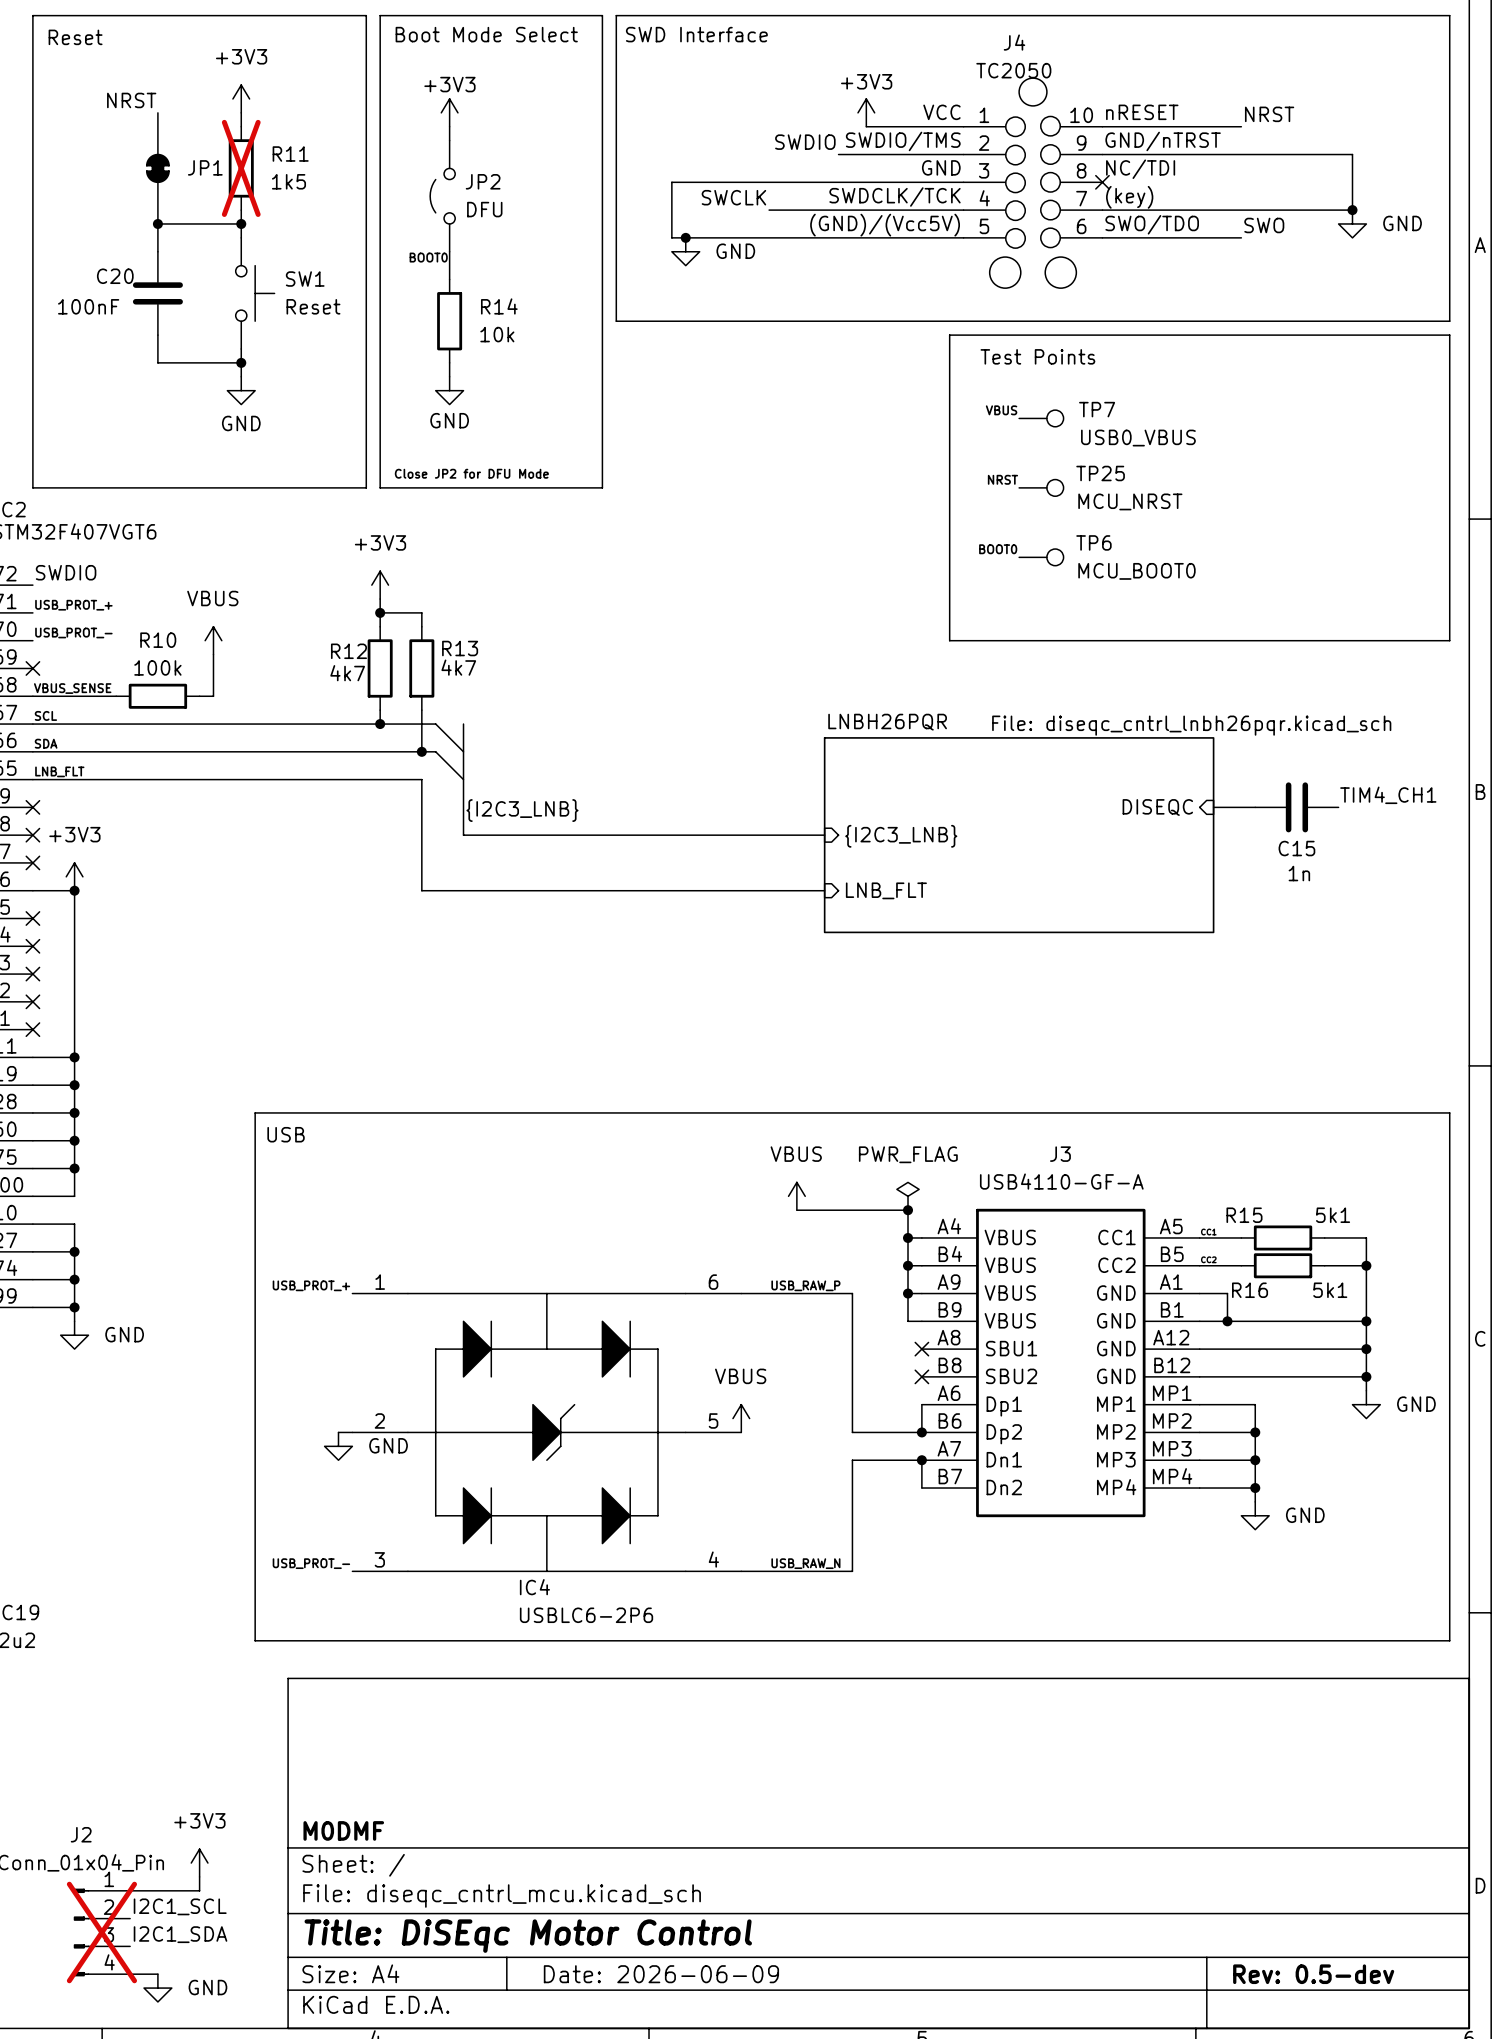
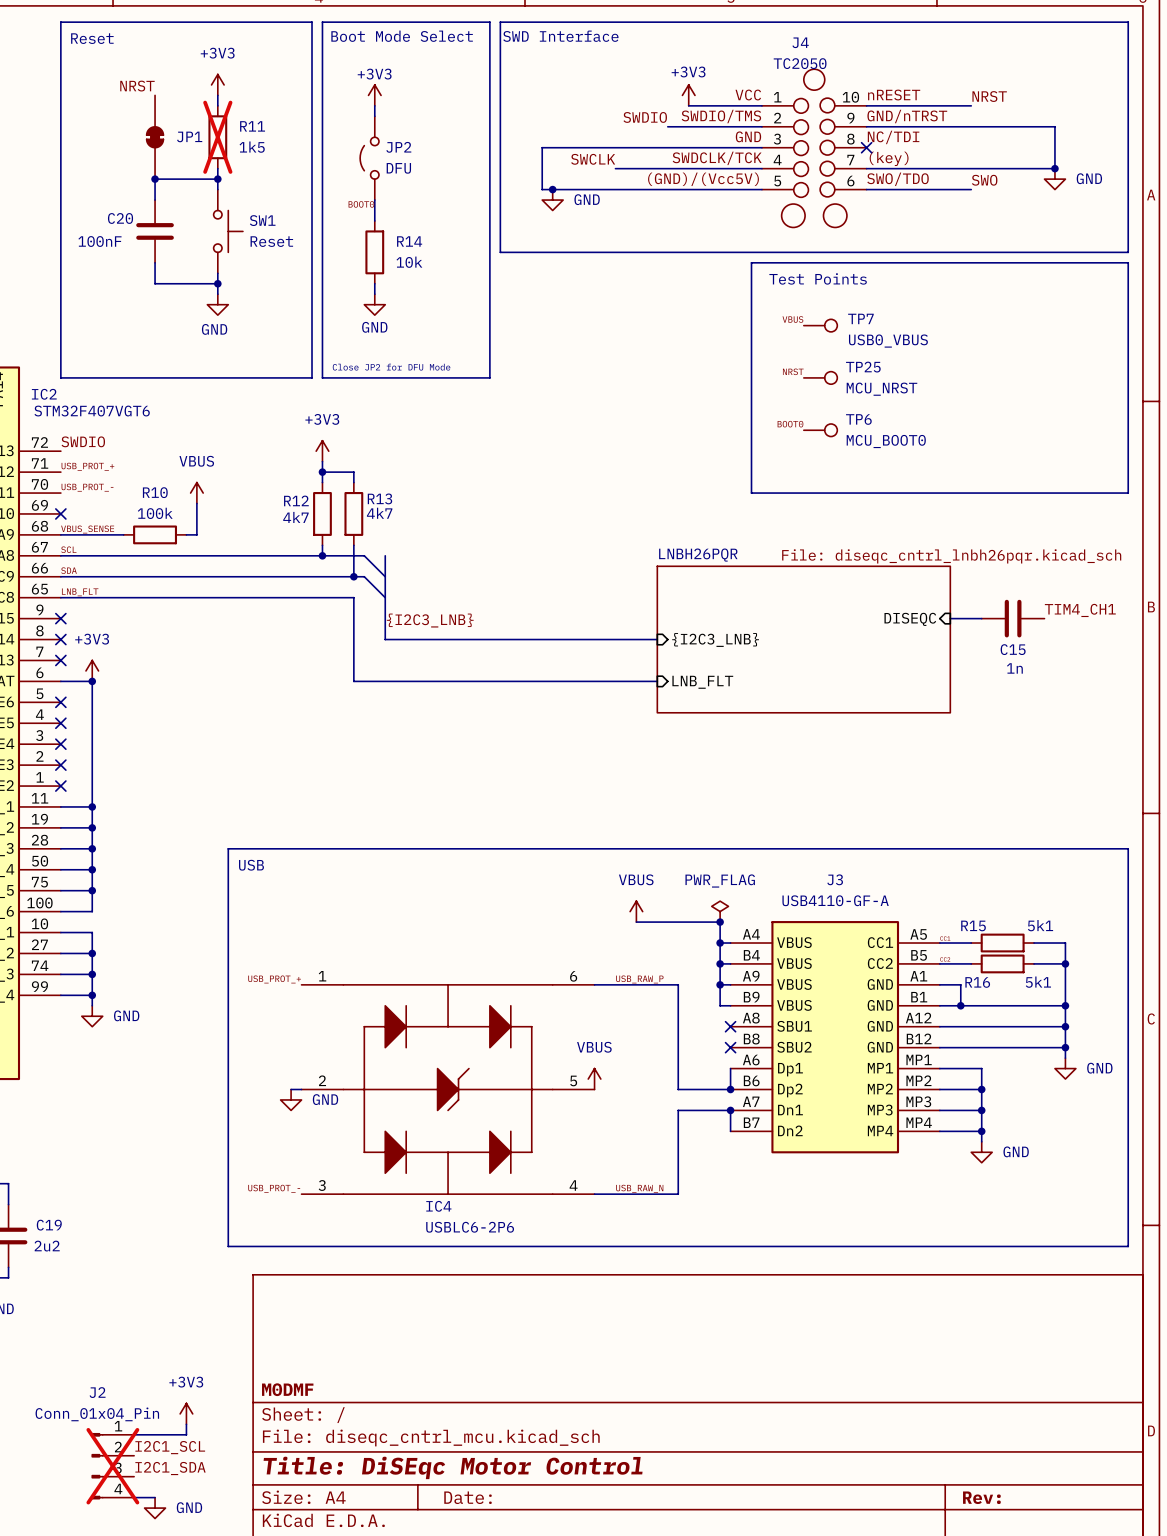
title block: Date: 2026-06-09 (661, 1974) -> Date: (468, 1497)
title block: Rev: 0.5-dev (1313, 1974) -> Rev: (981, 1497)

